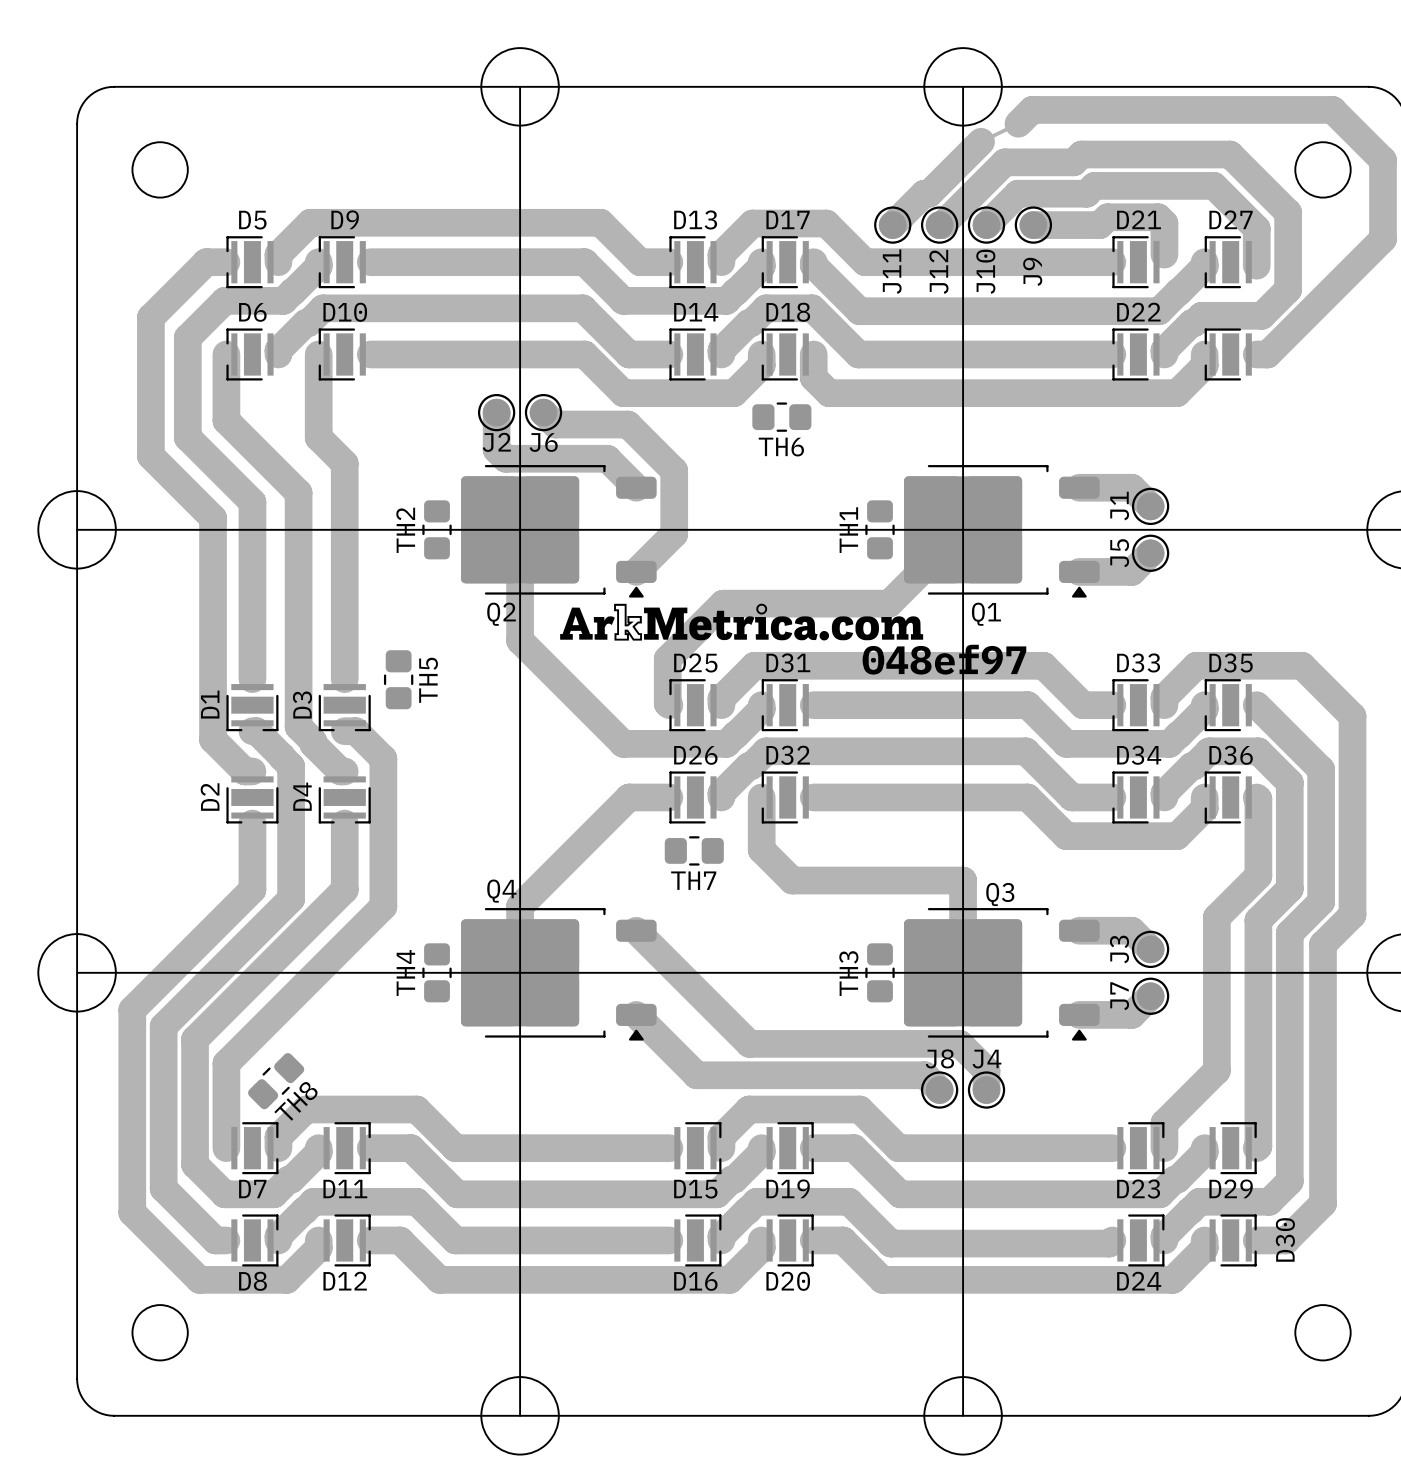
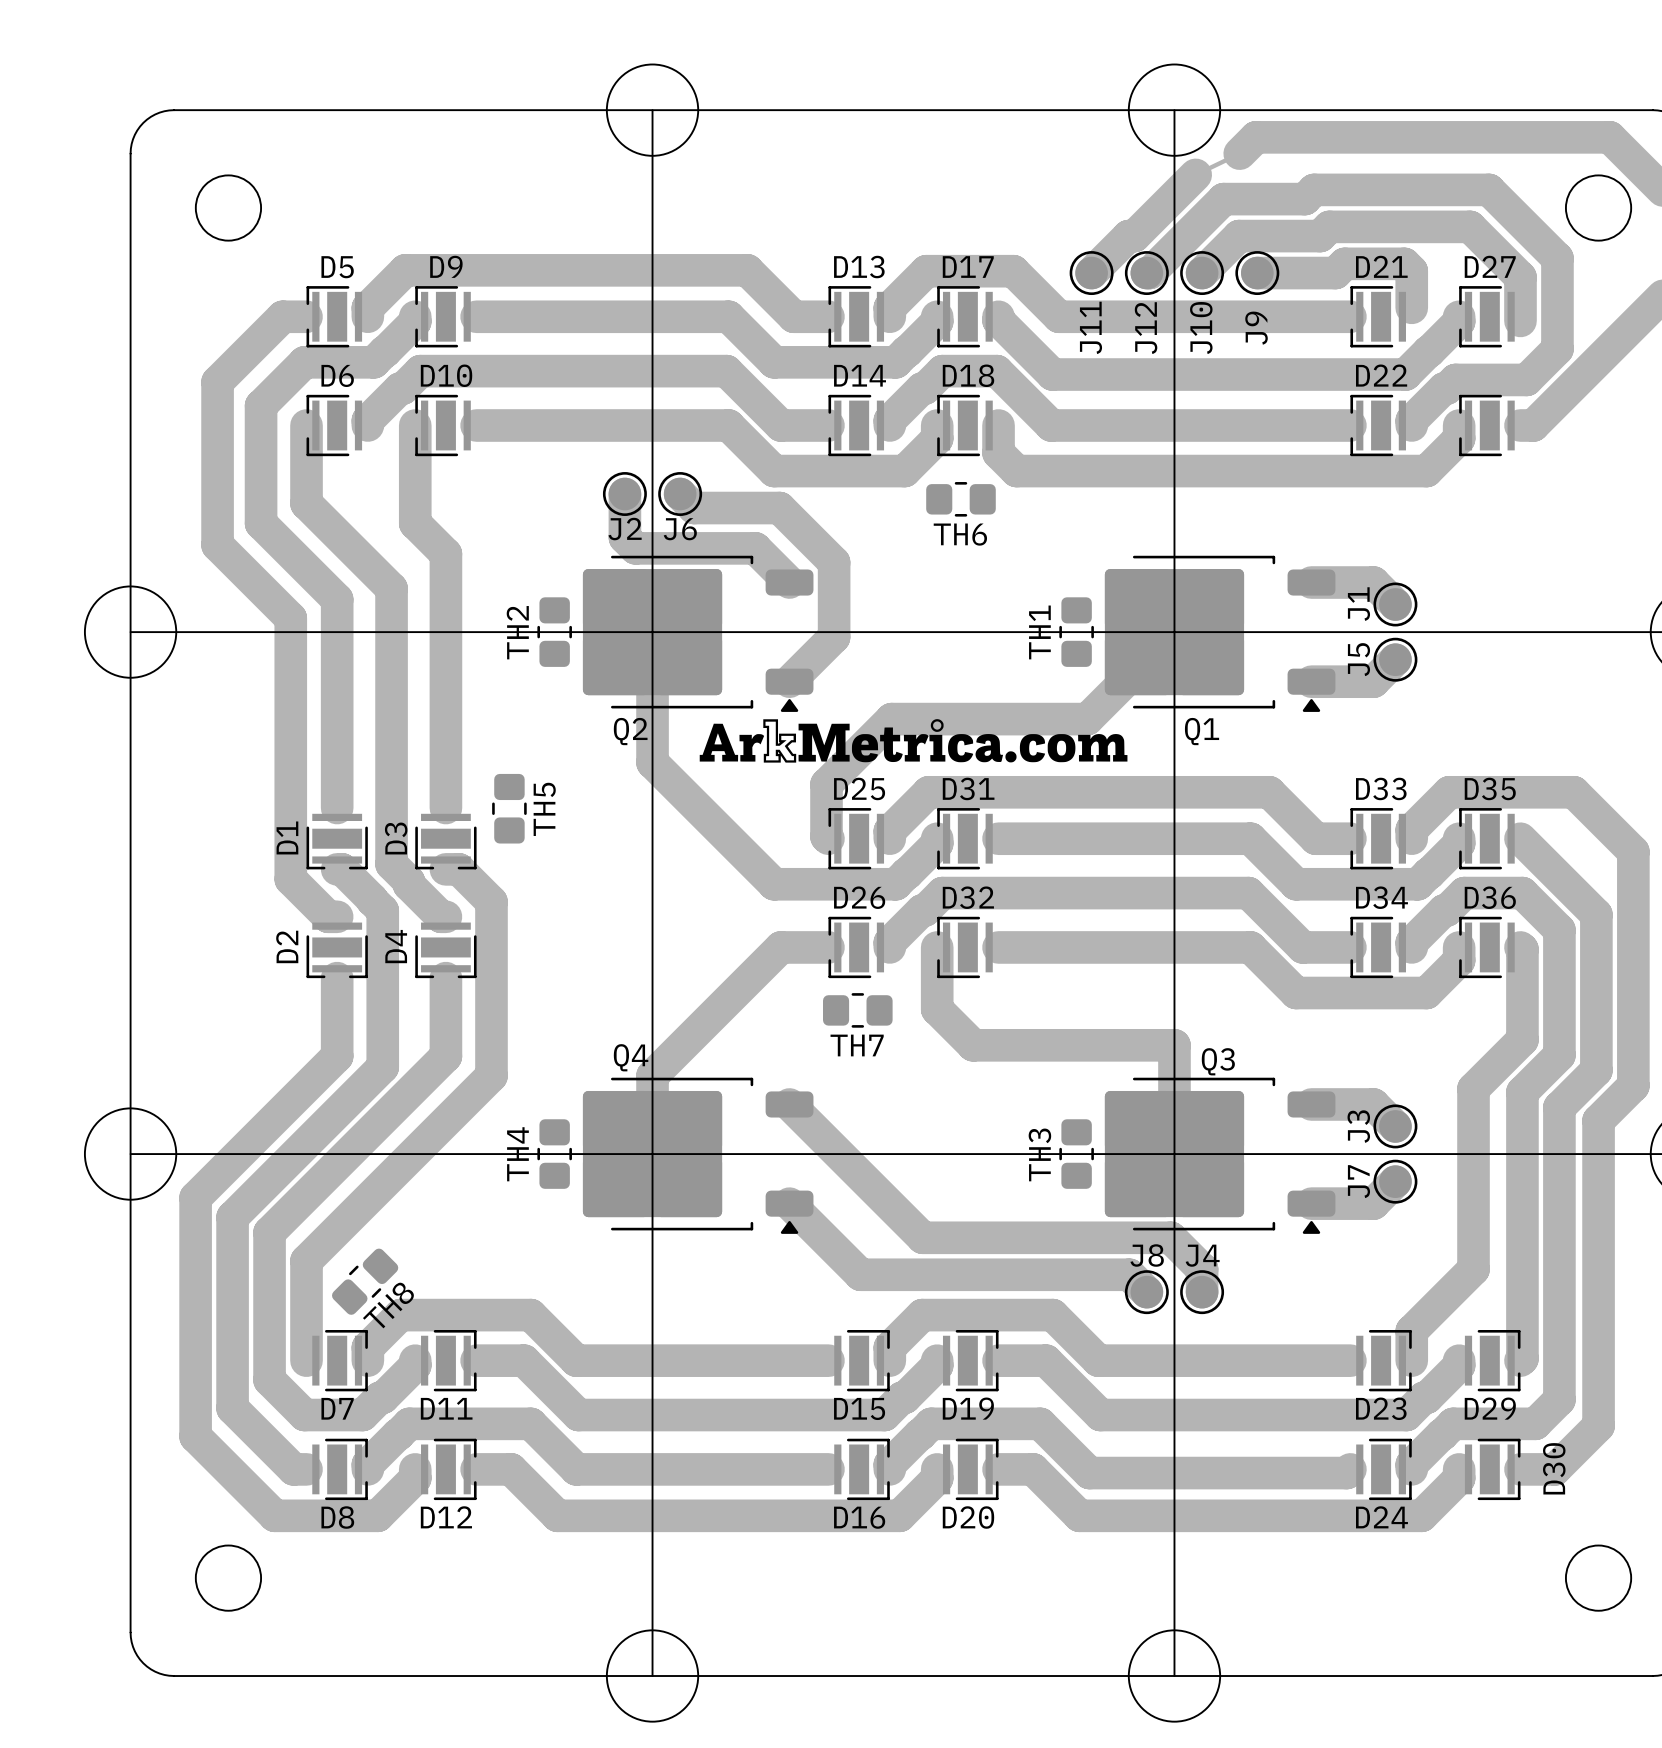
text: 048ef97 (944, 659) -> none

